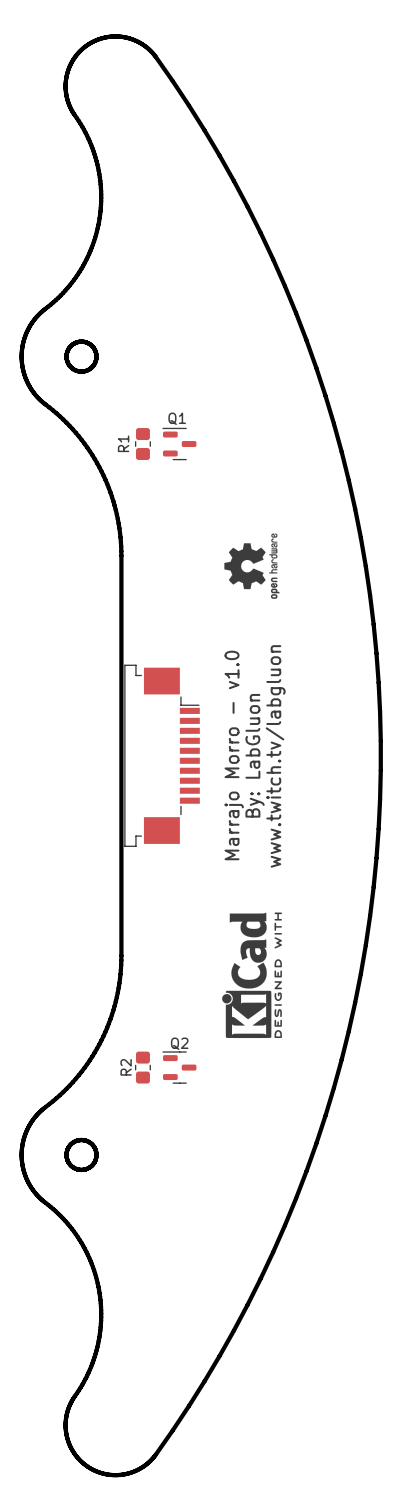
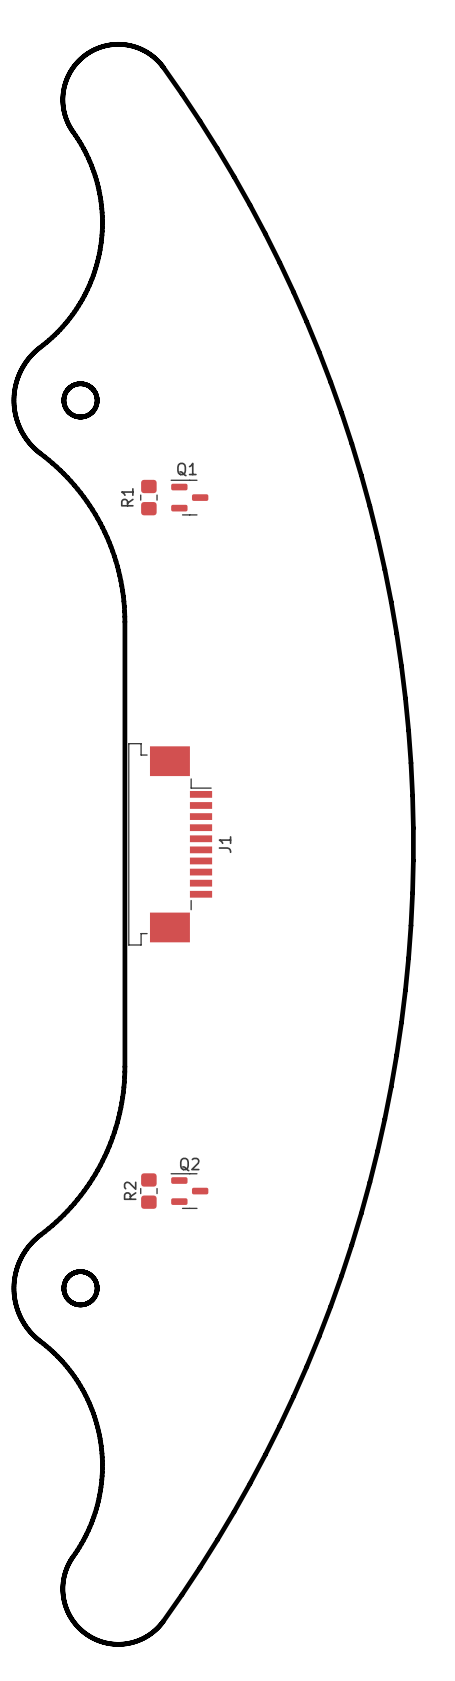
drawing: [224, 533, 280, 599] -> none
text: Marrajo Morro - v1.0 (234, 755) -> none
text: By: LabGluon (255, 755) -> none
J1 name: none -> J1 (225, 844)
text: www.twitch.tv/labgluon (275, 756) -> none
drawing: [222, 912, 282, 1039] -> none

